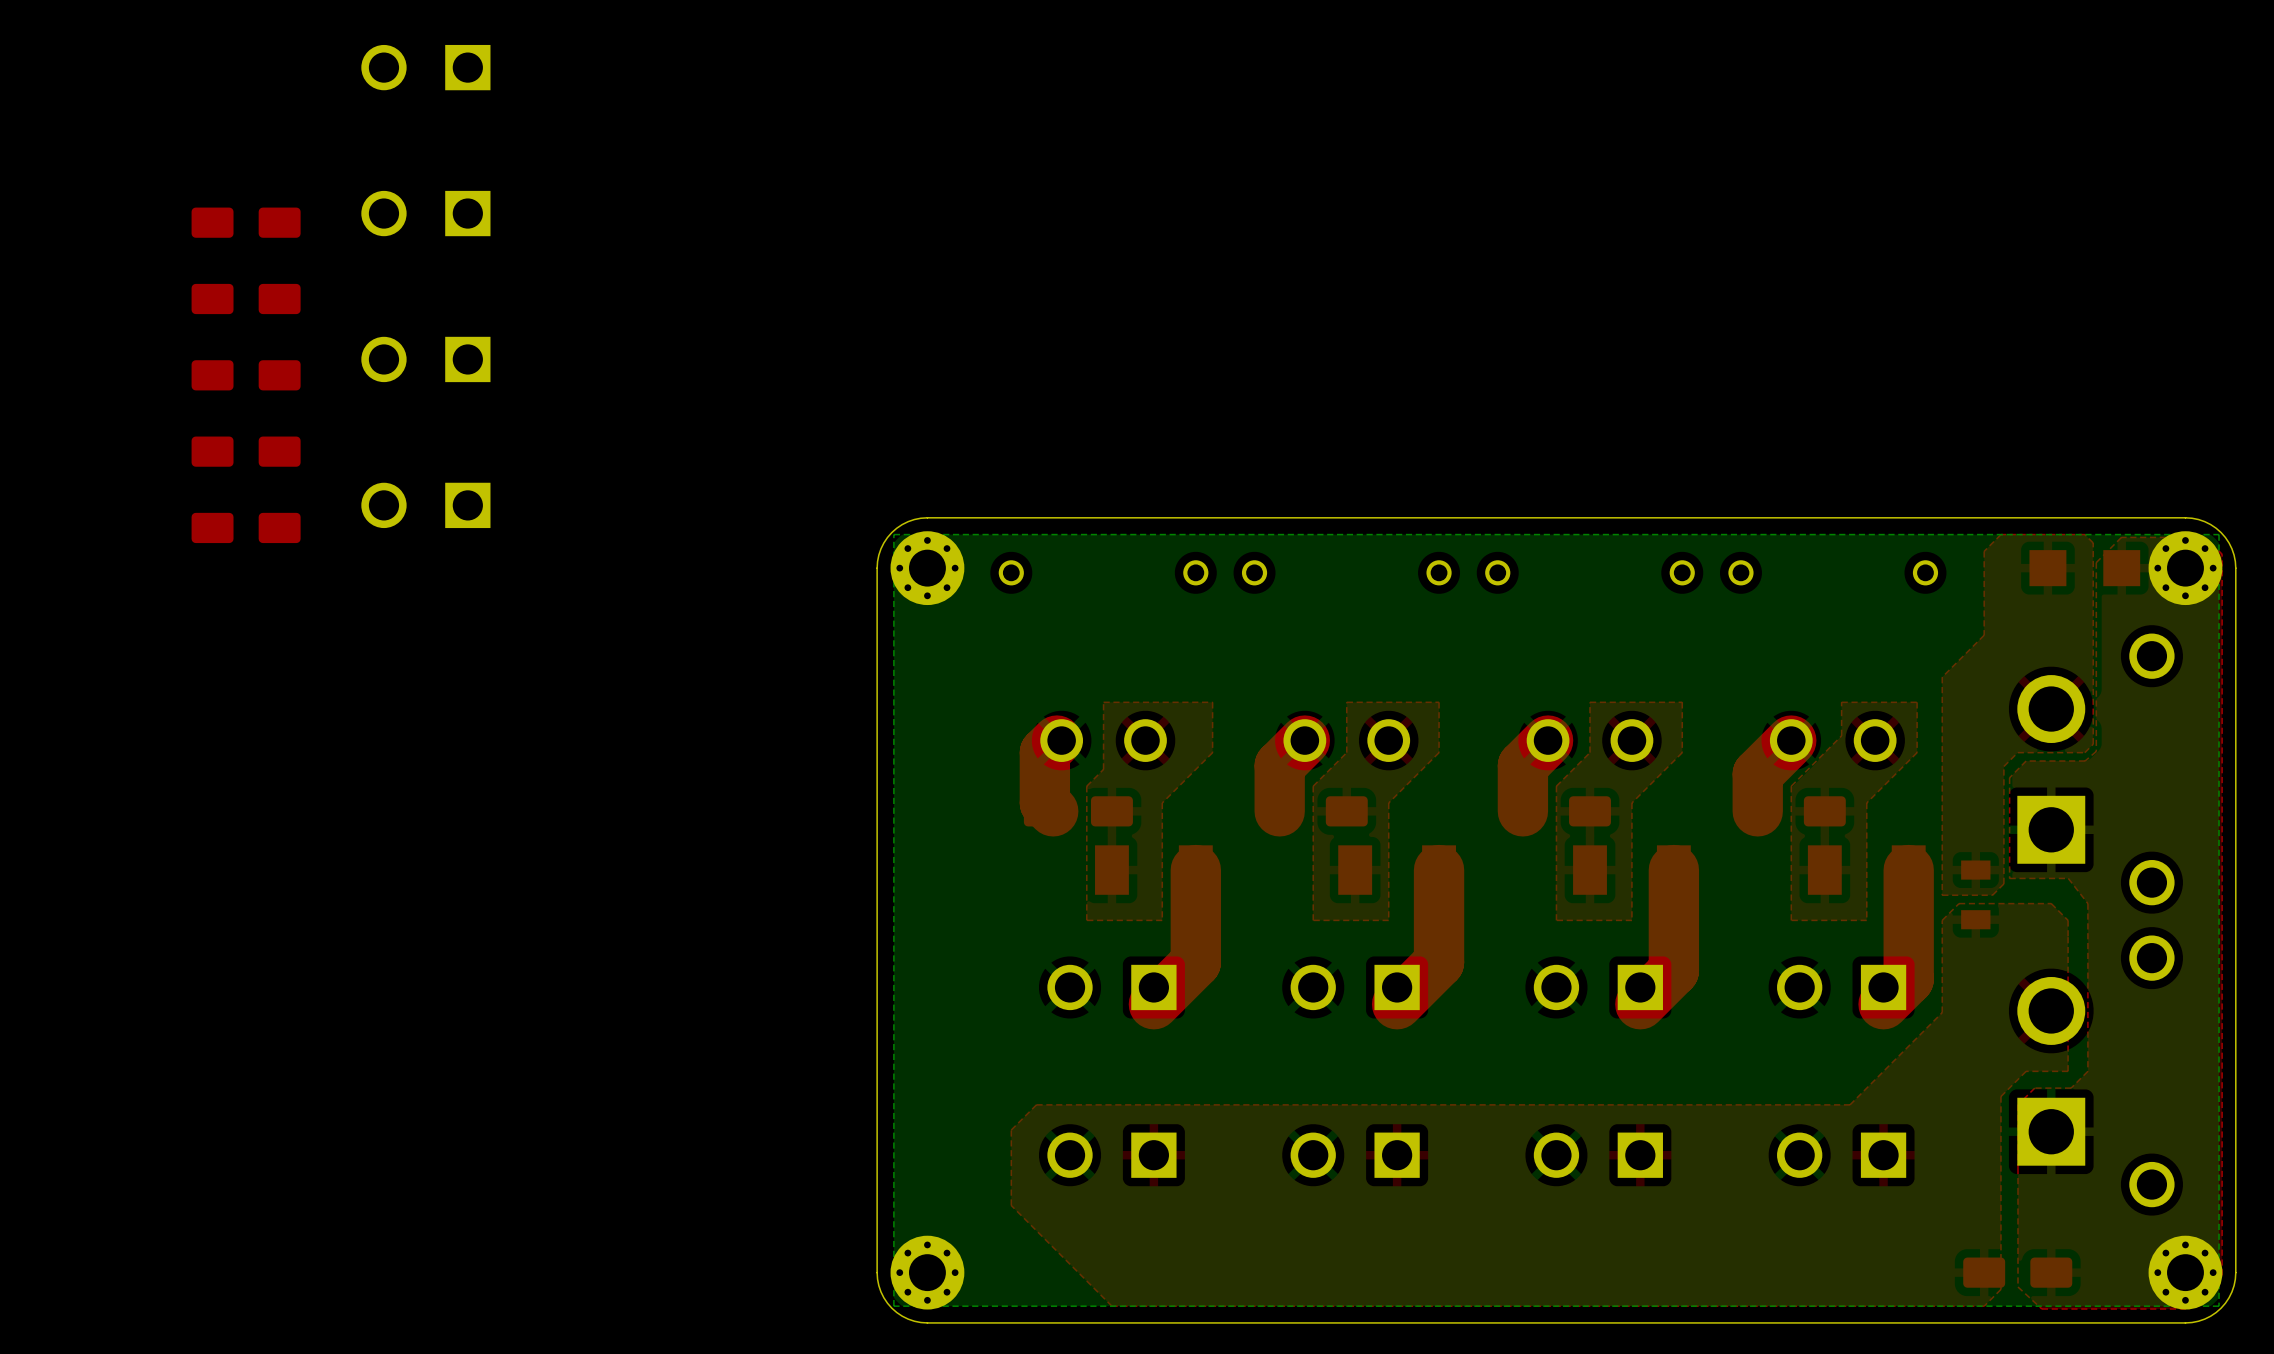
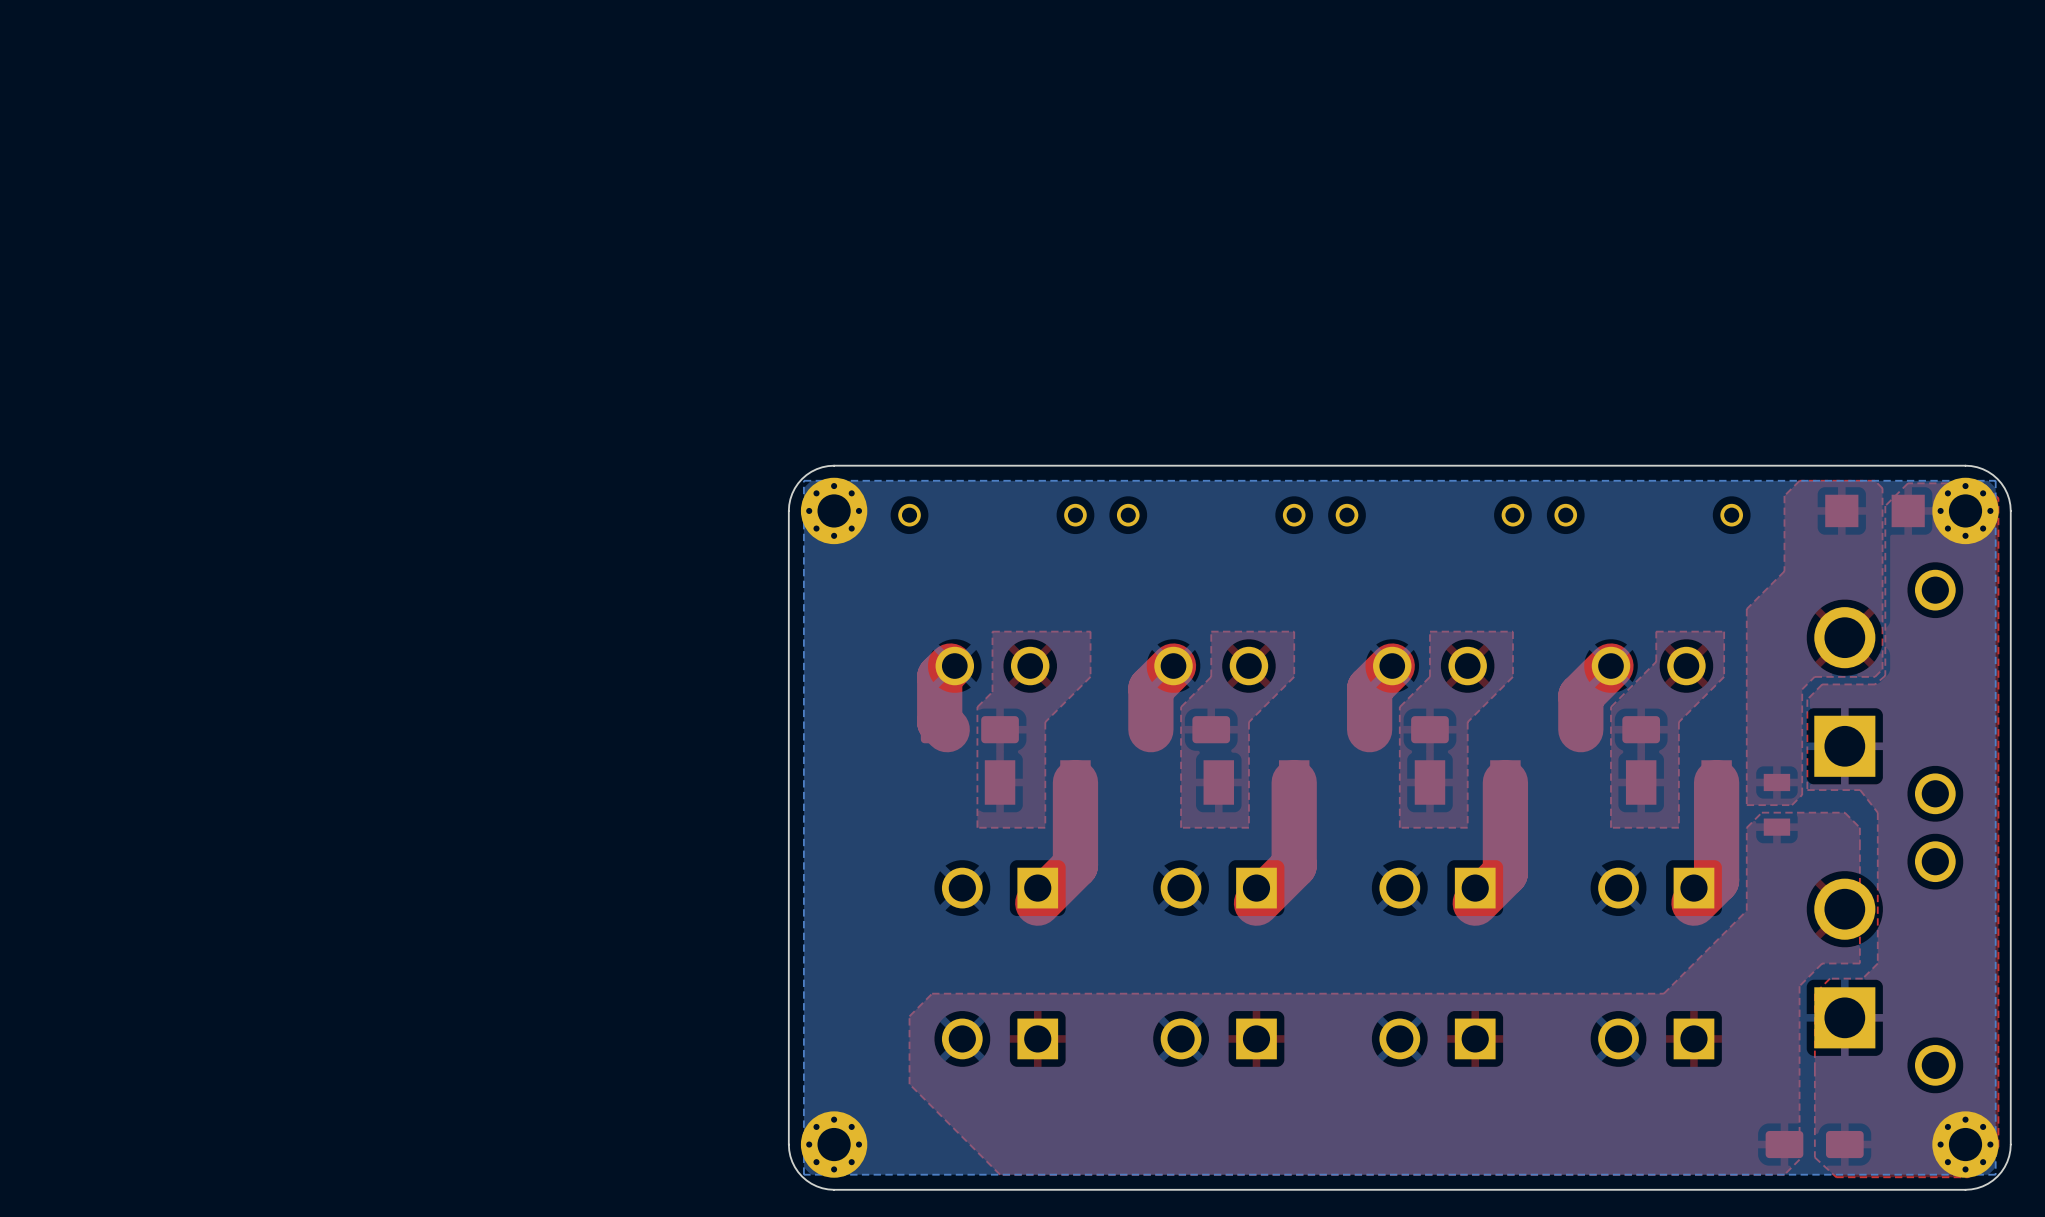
part: (425, 67) -> none
part: (425, 213) -> none
part: (246, 222) -> none
part: (246, 299) -> none
part: (425, 359) -> none
part: (246, 375) -> none
part: (246, 451) -> none
part: (425, 505) -> none
part: (246, 527) -> none

